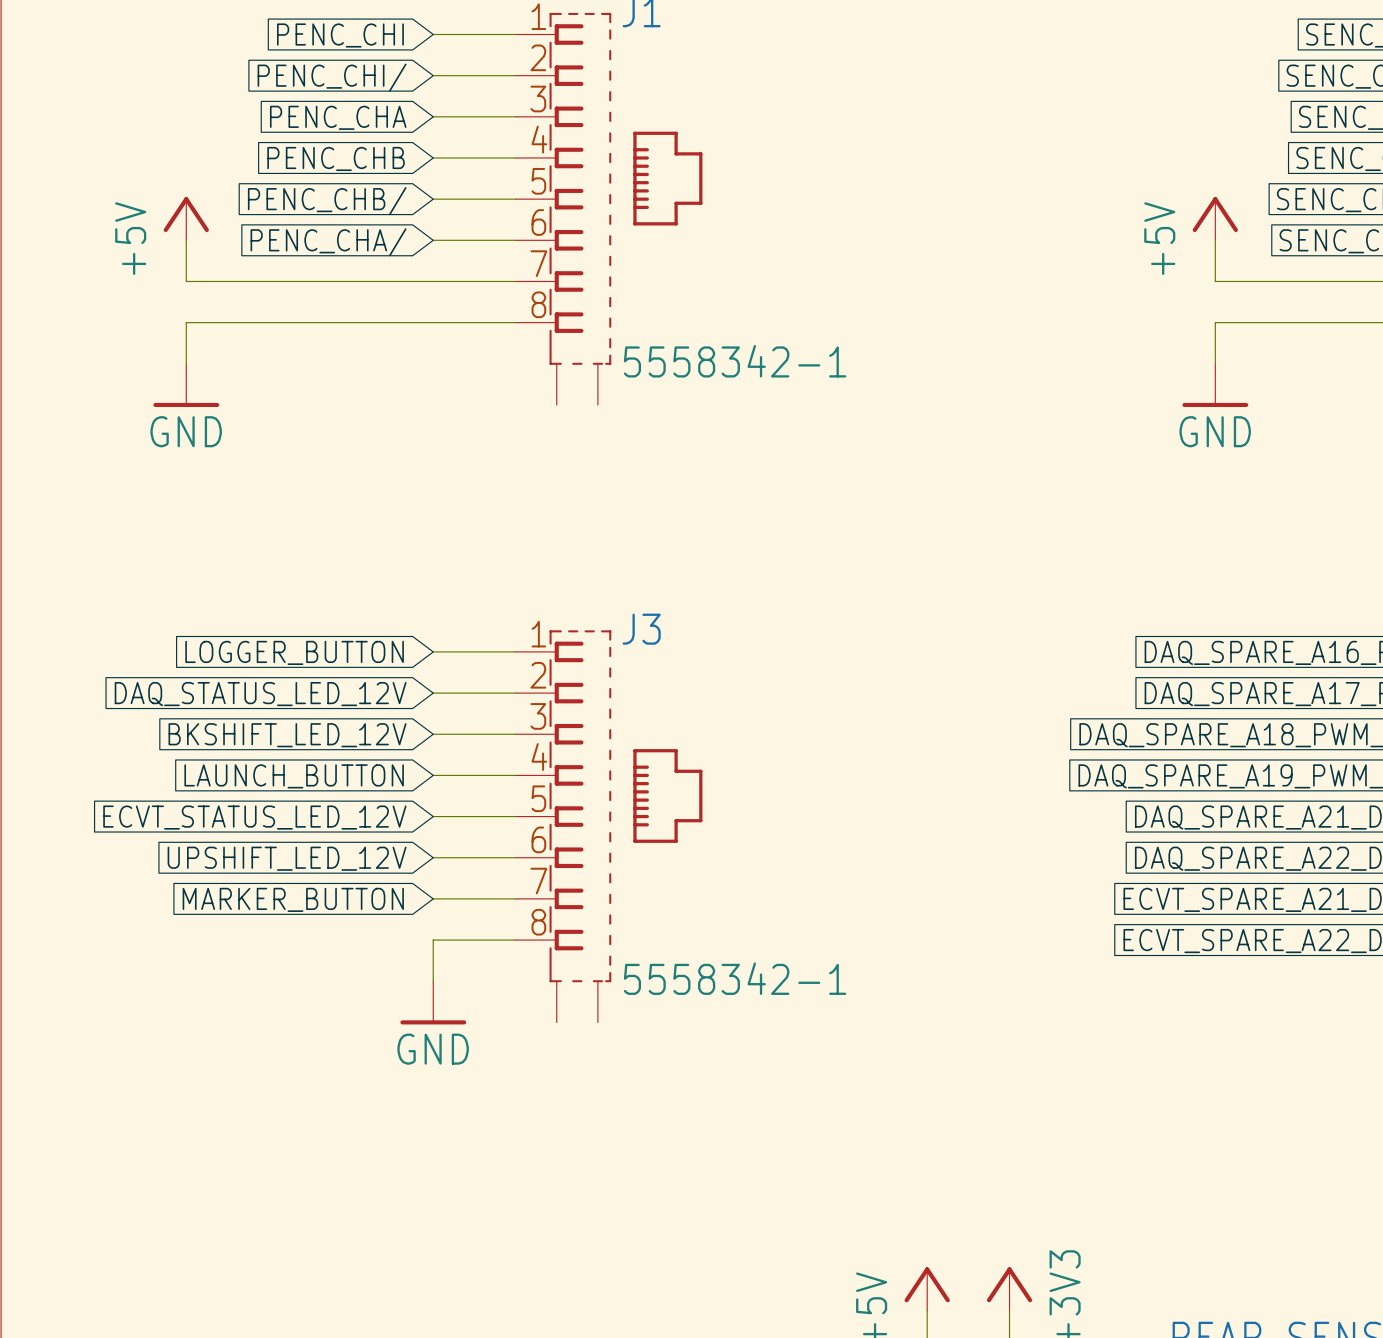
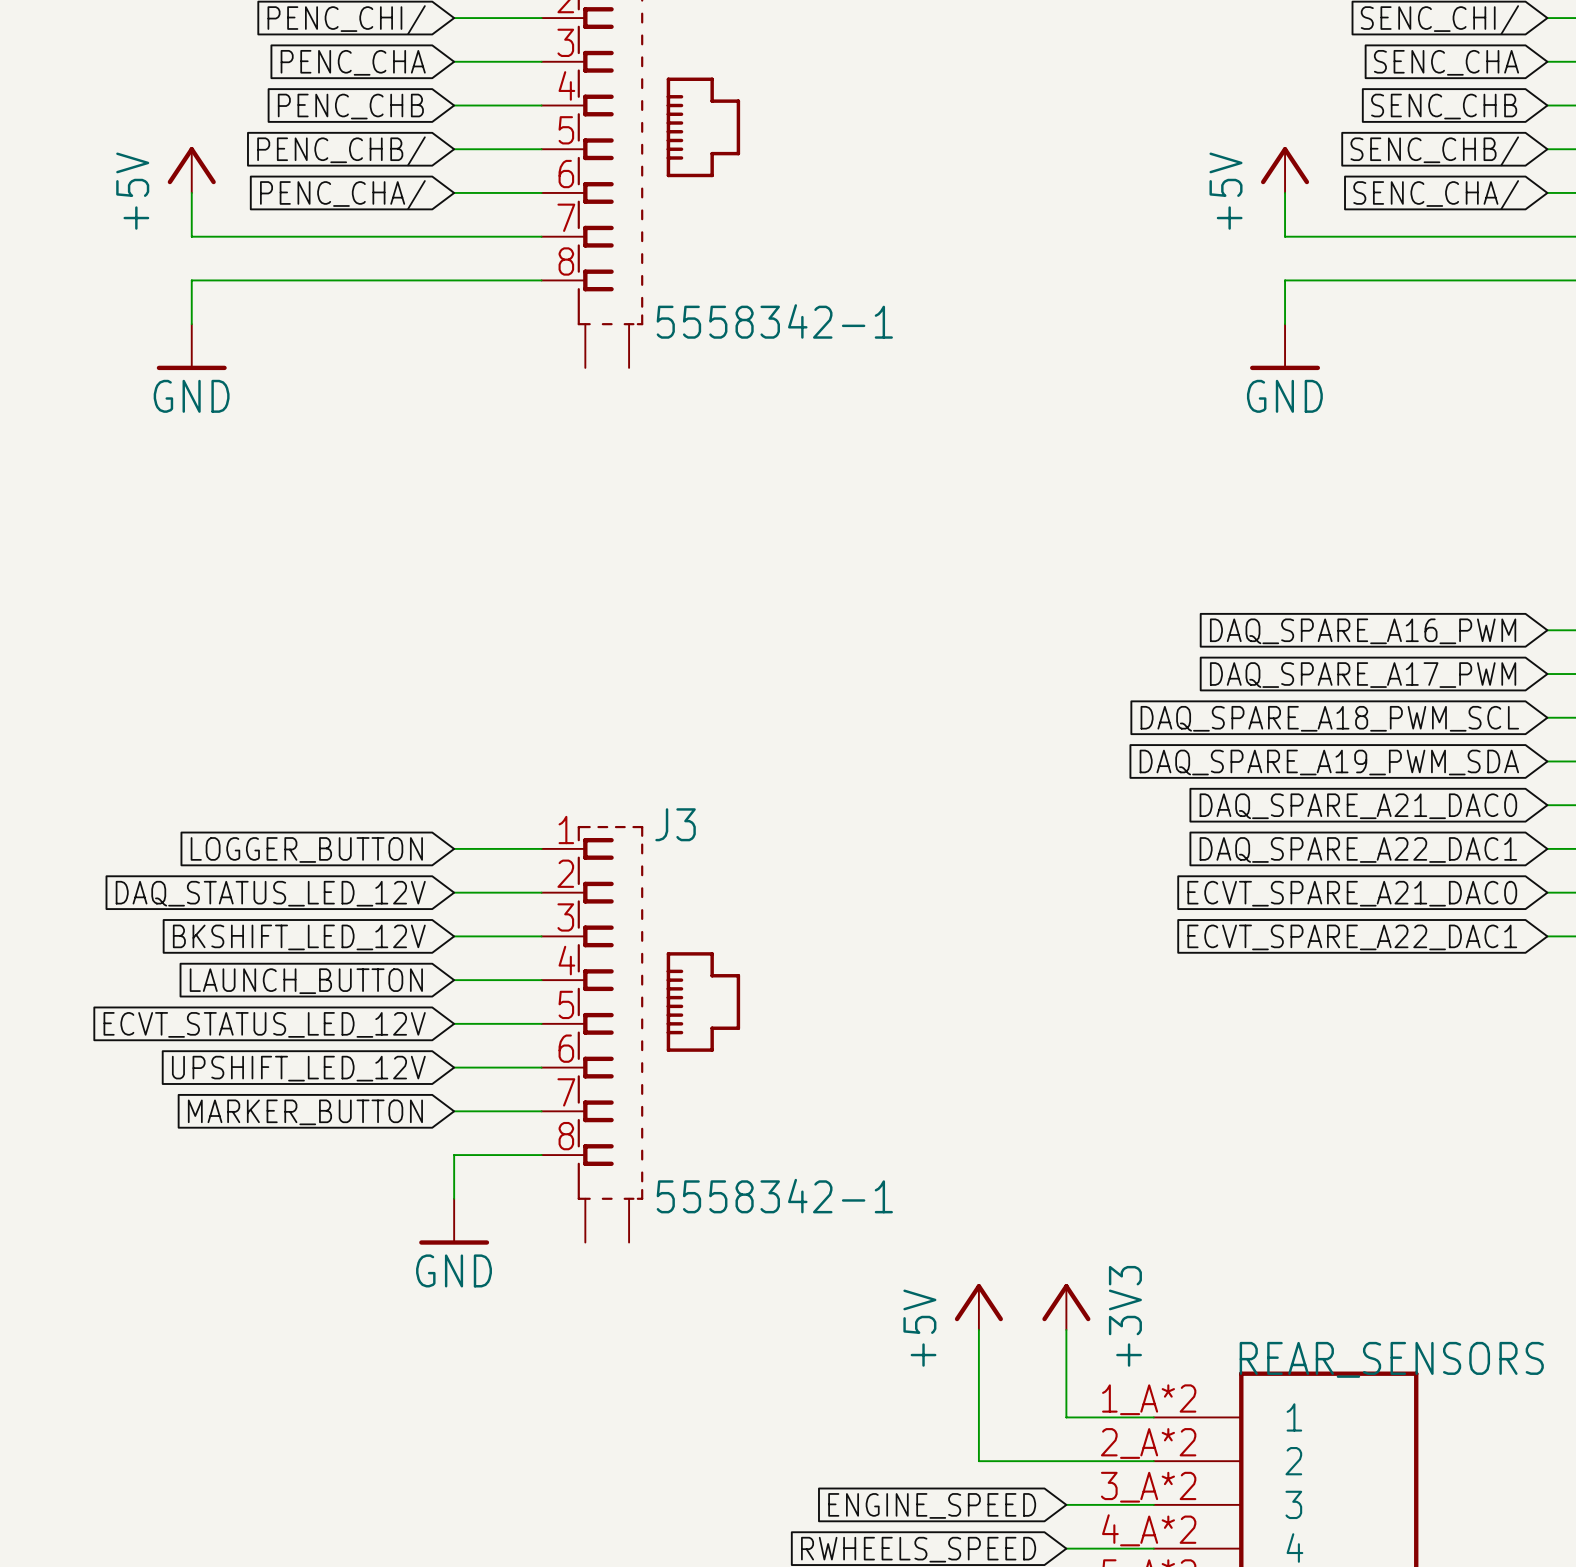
wire: (433, 651) (515, 651) -> none
global label: LOGGER_BUTTON (294, 652) -> none
wire: (433, 693) (515, 693) -> (454, 1023) (541, 1023)
global label: DAQ_STATUS_LED_12V (260, 694) -> none
wire: (433, 734) (515, 734) -> (454, 1067) (541, 1067)
global label position: BKSHIFT_LED_12V (287, 735) -> BKSHIFT_LED_12V (299, 937)
wire: (433, 775) (515, 775) -> (454, 1111) (541, 1111)
global label position: LAUNCH_BUTTON (294, 776) -> LAUNCH_BUTTON (306, 981)
wire: (433, 816) (515, 816) -> none
global label position: ECVT_STATUS_LED_12V (254, 817) -> ECVT_STATUS_LED_12V (264, 1024)
J3 position: (609, 826) -> (640, 1034)
global label: UPSHIFT_LED_12V (287, 858) -> LOGGER_BUTTON (306, 849)
global label: MARKER_BUTTON (293, 899) -> DAQ_STATUS_LED_12V (270, 893)
wire: (433, 940) (433, 981) -> (541, 980) (454, 980)
power symbol position: GND (433, 1002) -> GND (454, 1221)
global label: none -> UPSHIFT_LED_12V (298, 1068)
global label: none -> MARKER_BUTTON (305, 1112)
wire: none -> (541, 1155) (454, 1155) (454, 1198)

